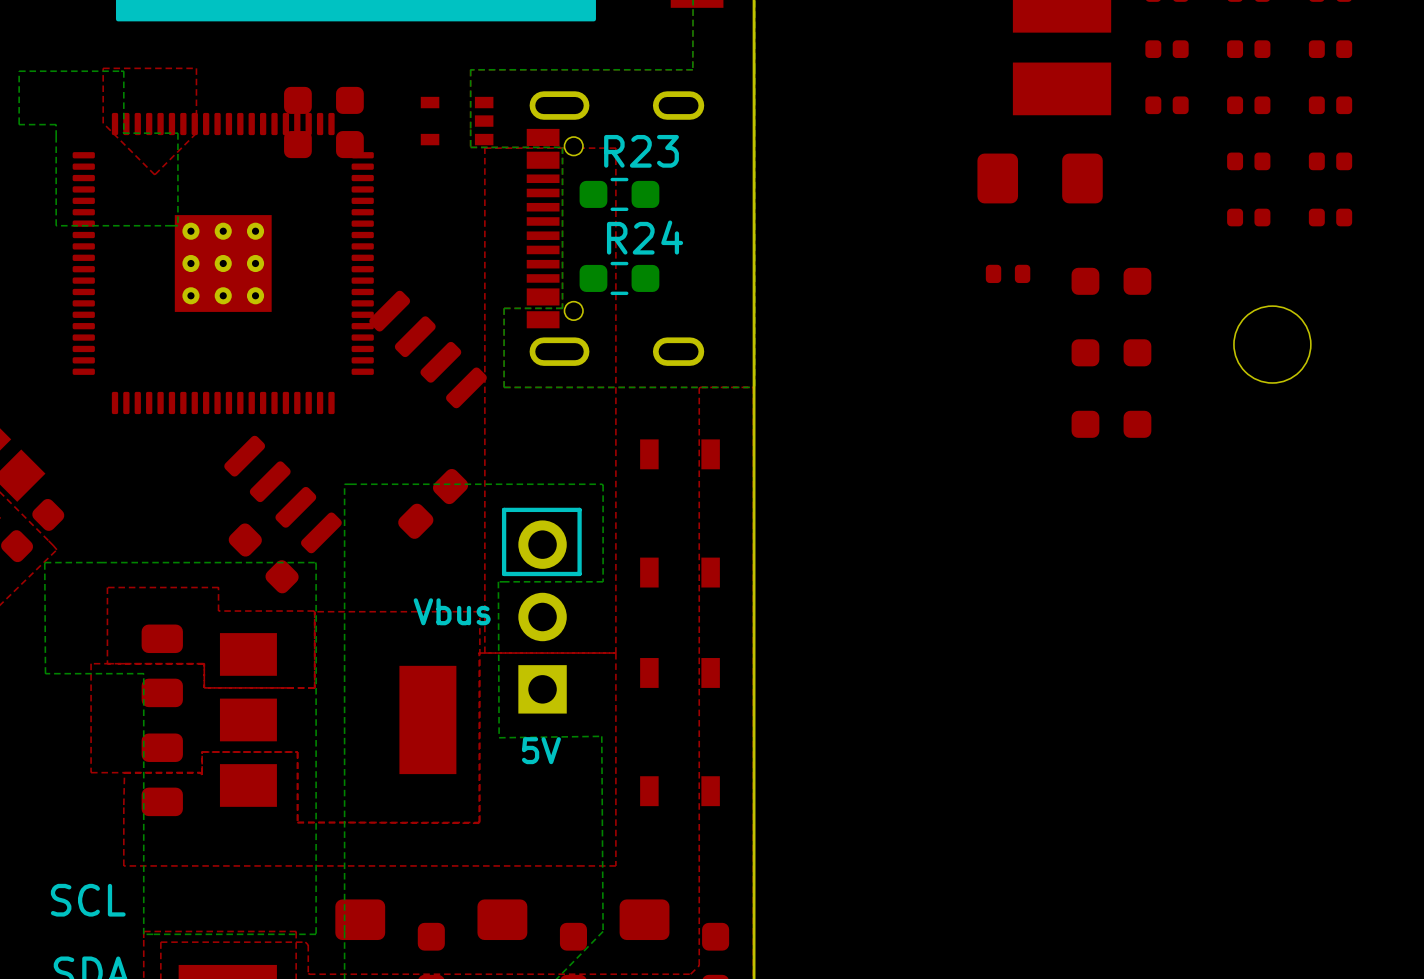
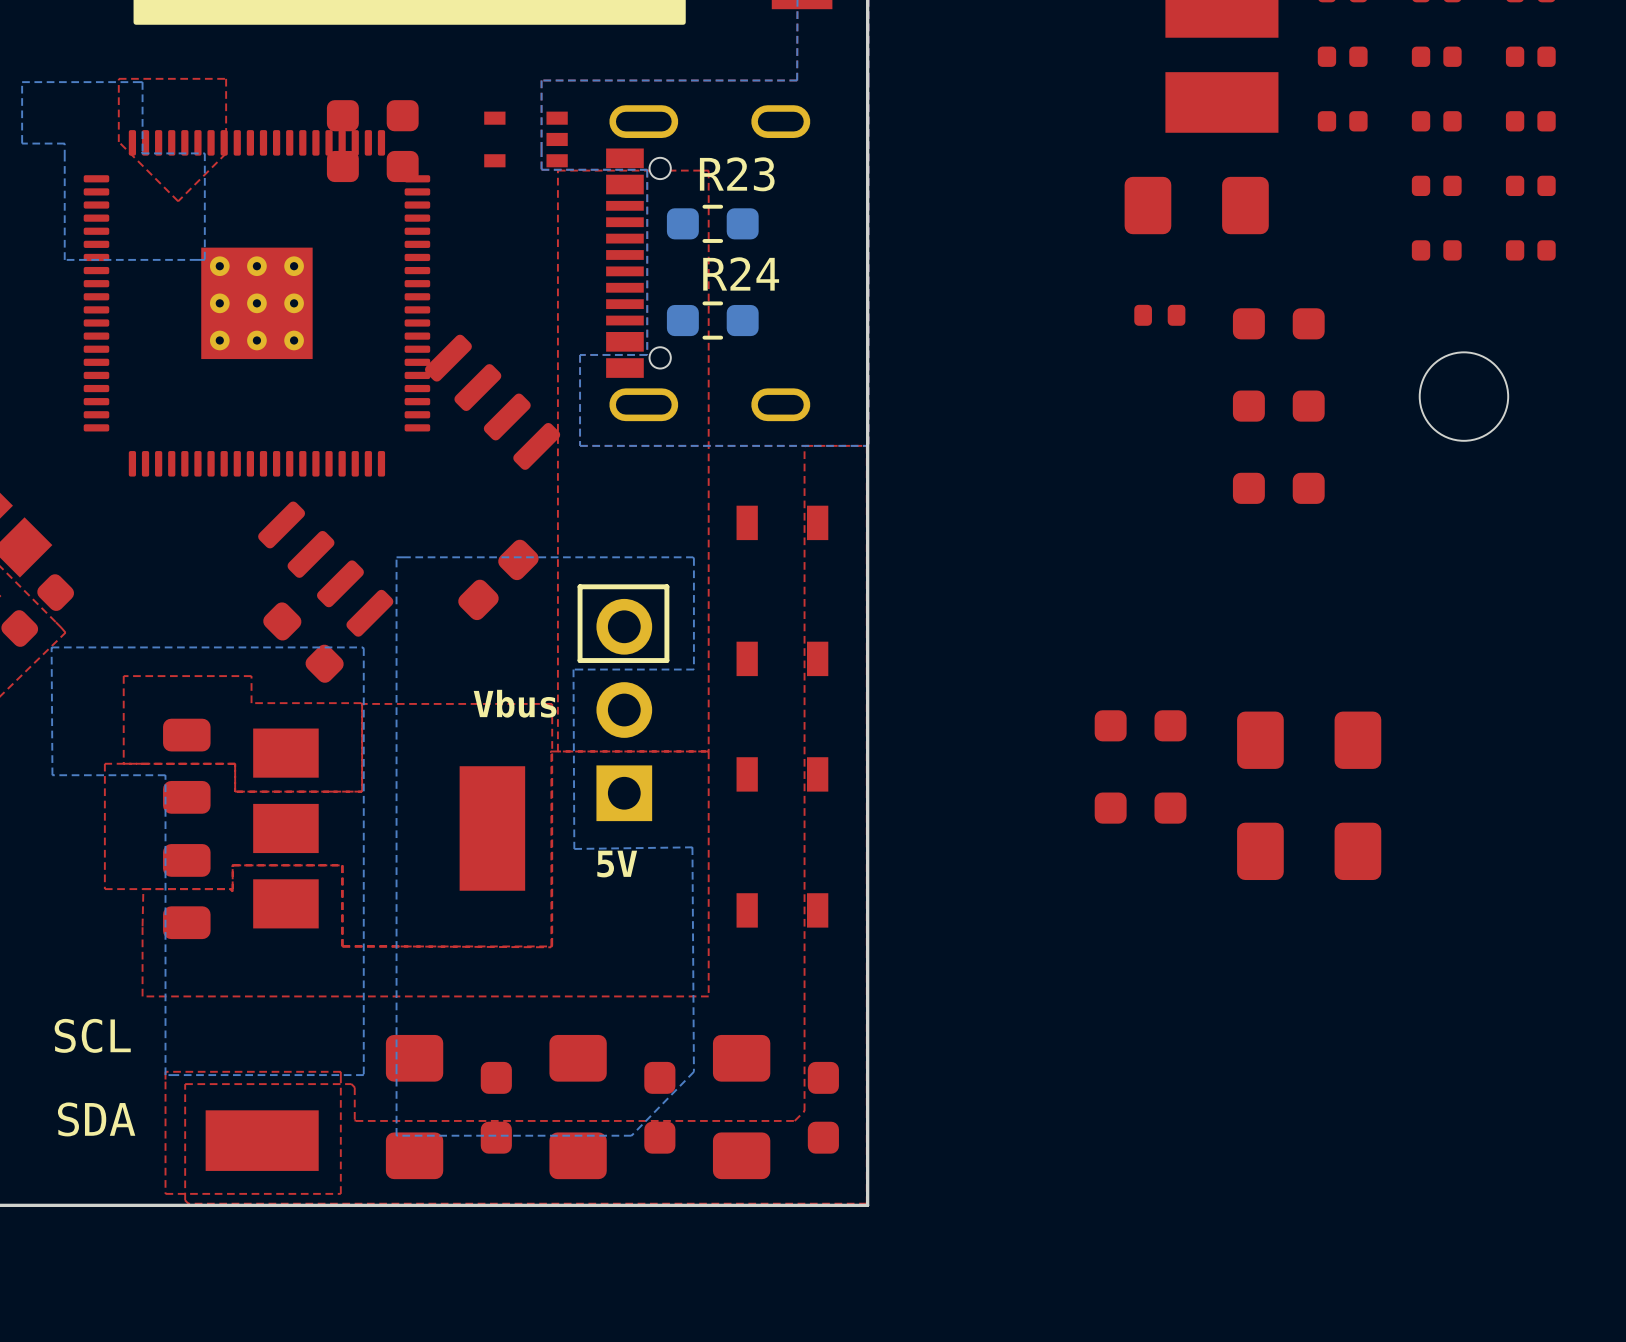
part: none -> (1140, 725)
part: none -> (1309, 740)
part: none -> (1140, 808)
part: none -> (1309, 851)

